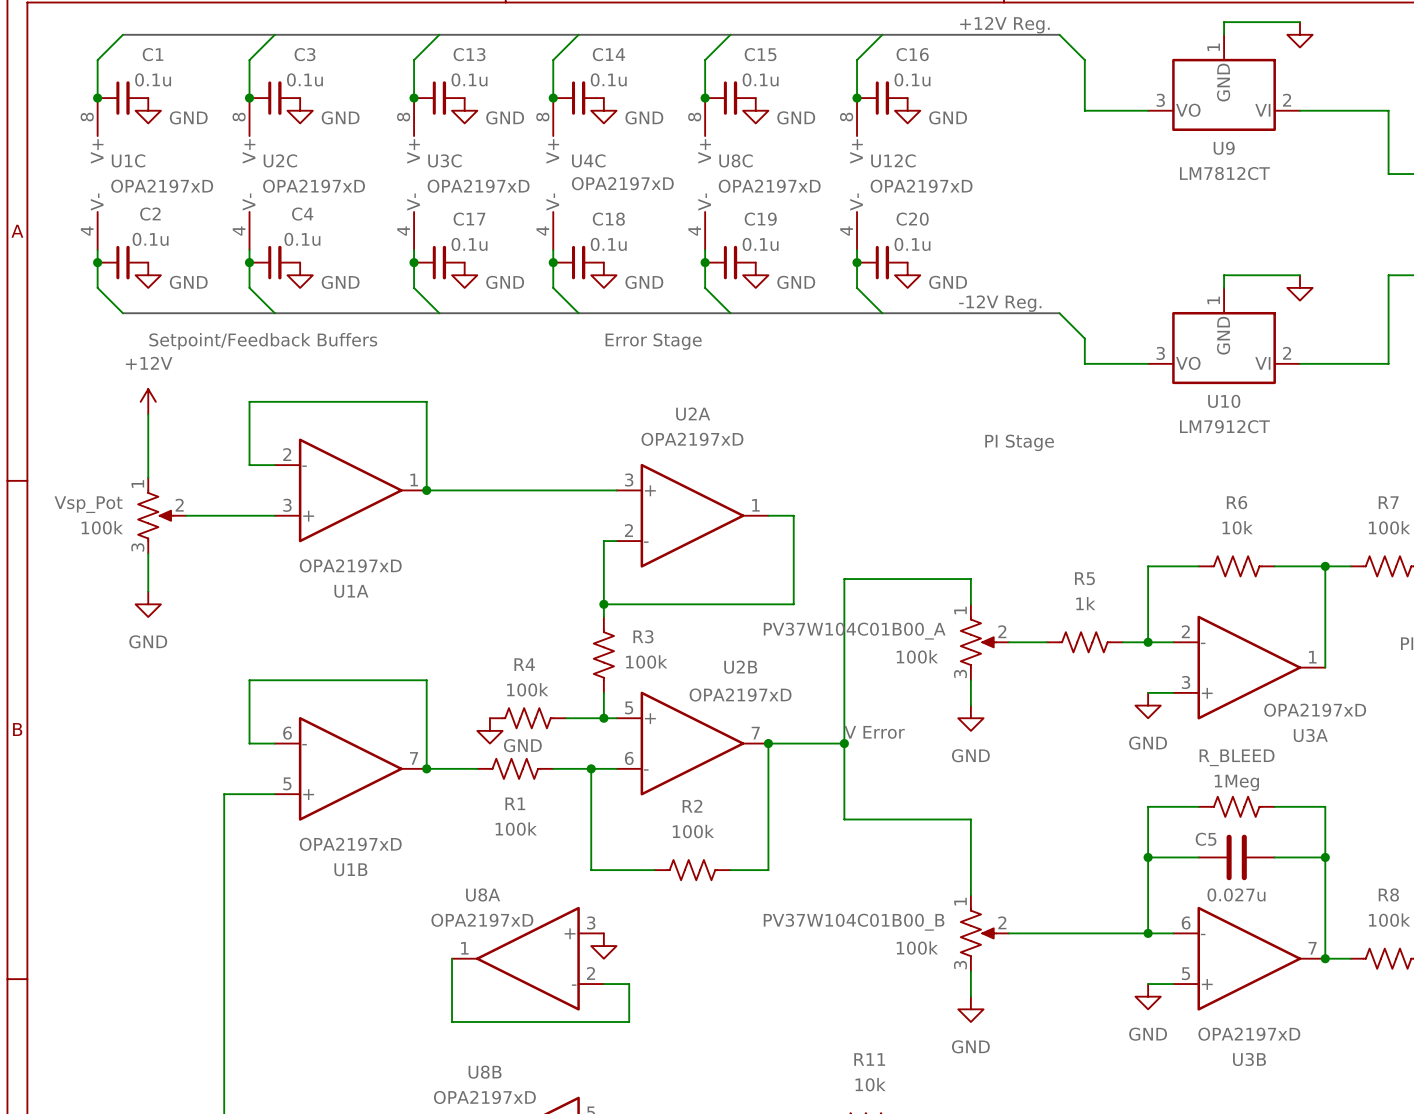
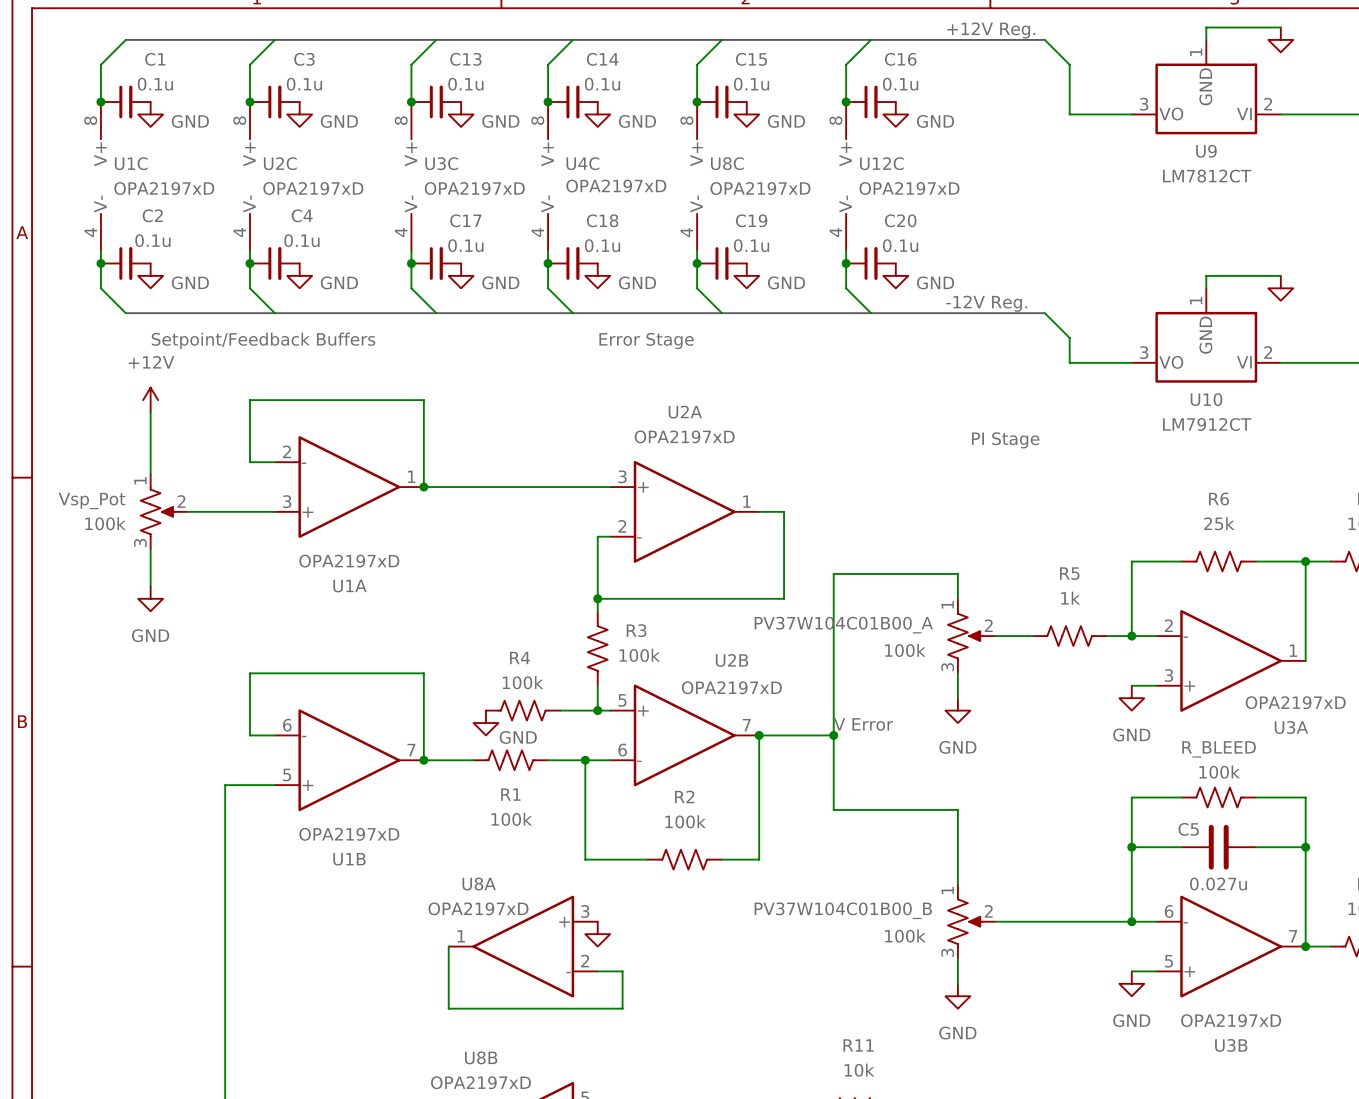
R6 value: 10k (1237, 527) -> 25k (1219, 523)
R_BLEED value: 1Meg (1236, 782) -> 100k (1219, 772)

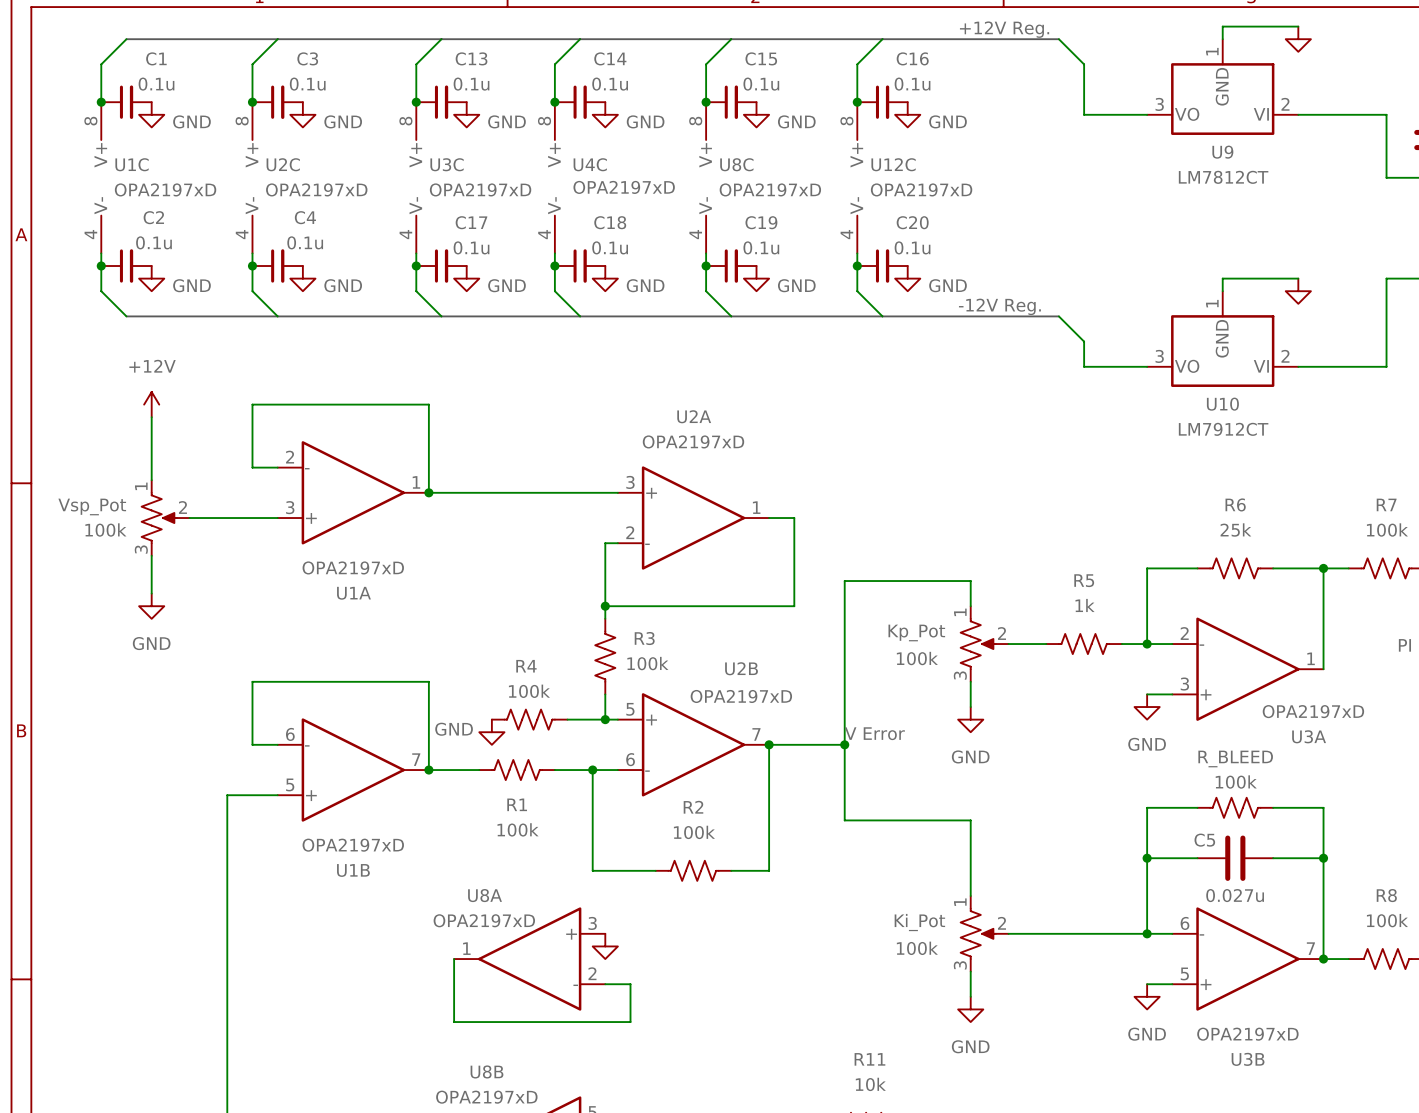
label: Setpoint/Feedback Buffers (263, 340) -> none
label: Error Stage (646, 341) -> none
label: PI Stage (1005, 440) -> none
PV37W104C01B00_A name: PV37W104C01B00_A (843, 625) -> Kp_Pot (916, 632)
power symbol text position: GND (518, 737) -> GND (454, 729)
PV37W104C01B00_B name: PV37W104C01B00_B (843, 910) -> Ki_Pot (919, 922)

